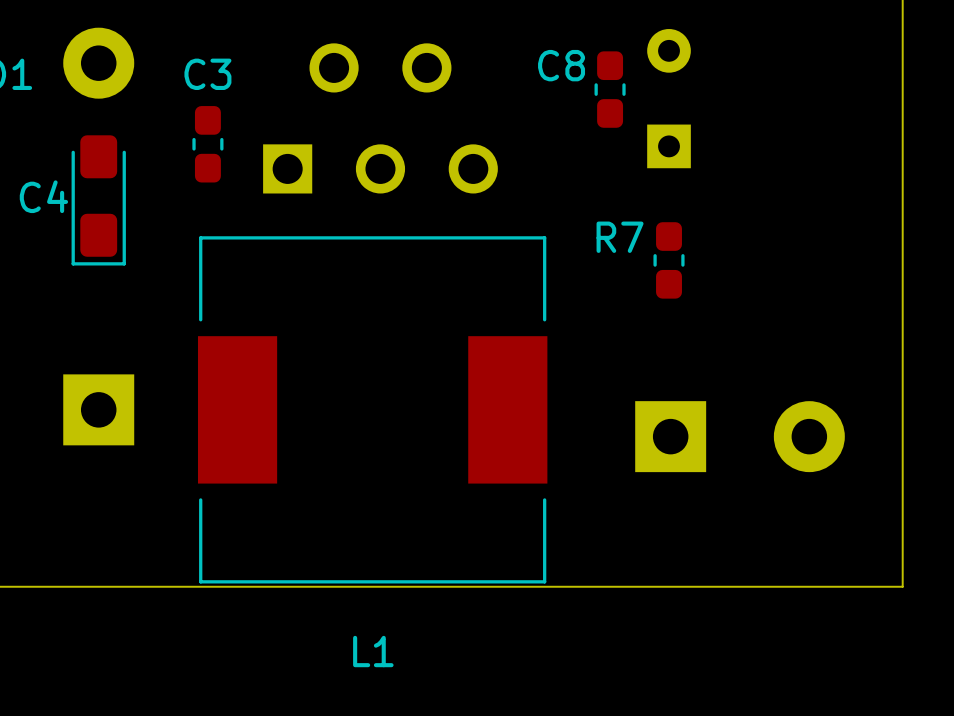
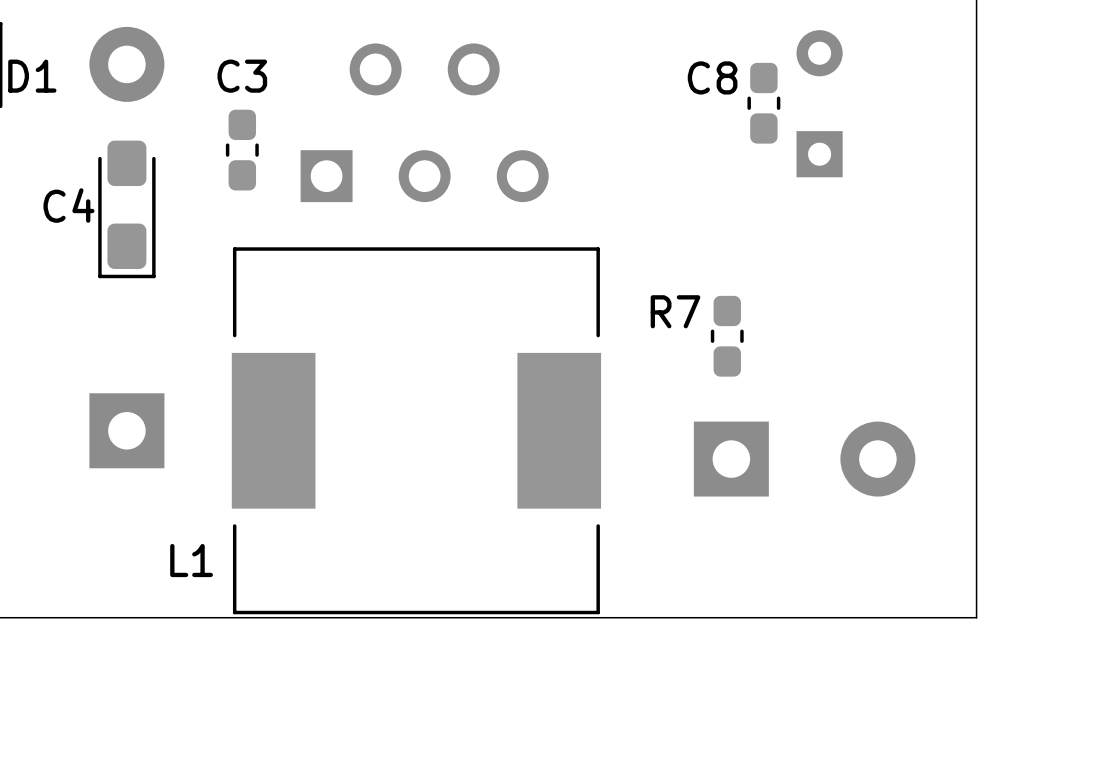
C8 position: (610, 89) -> (763, 103)
part position: (669, 98) -> (819, 103)
R7 position: (669, 260) -> (727, 336)
L1 name position: L1 (373, 651) -> L1 (191, 560)

